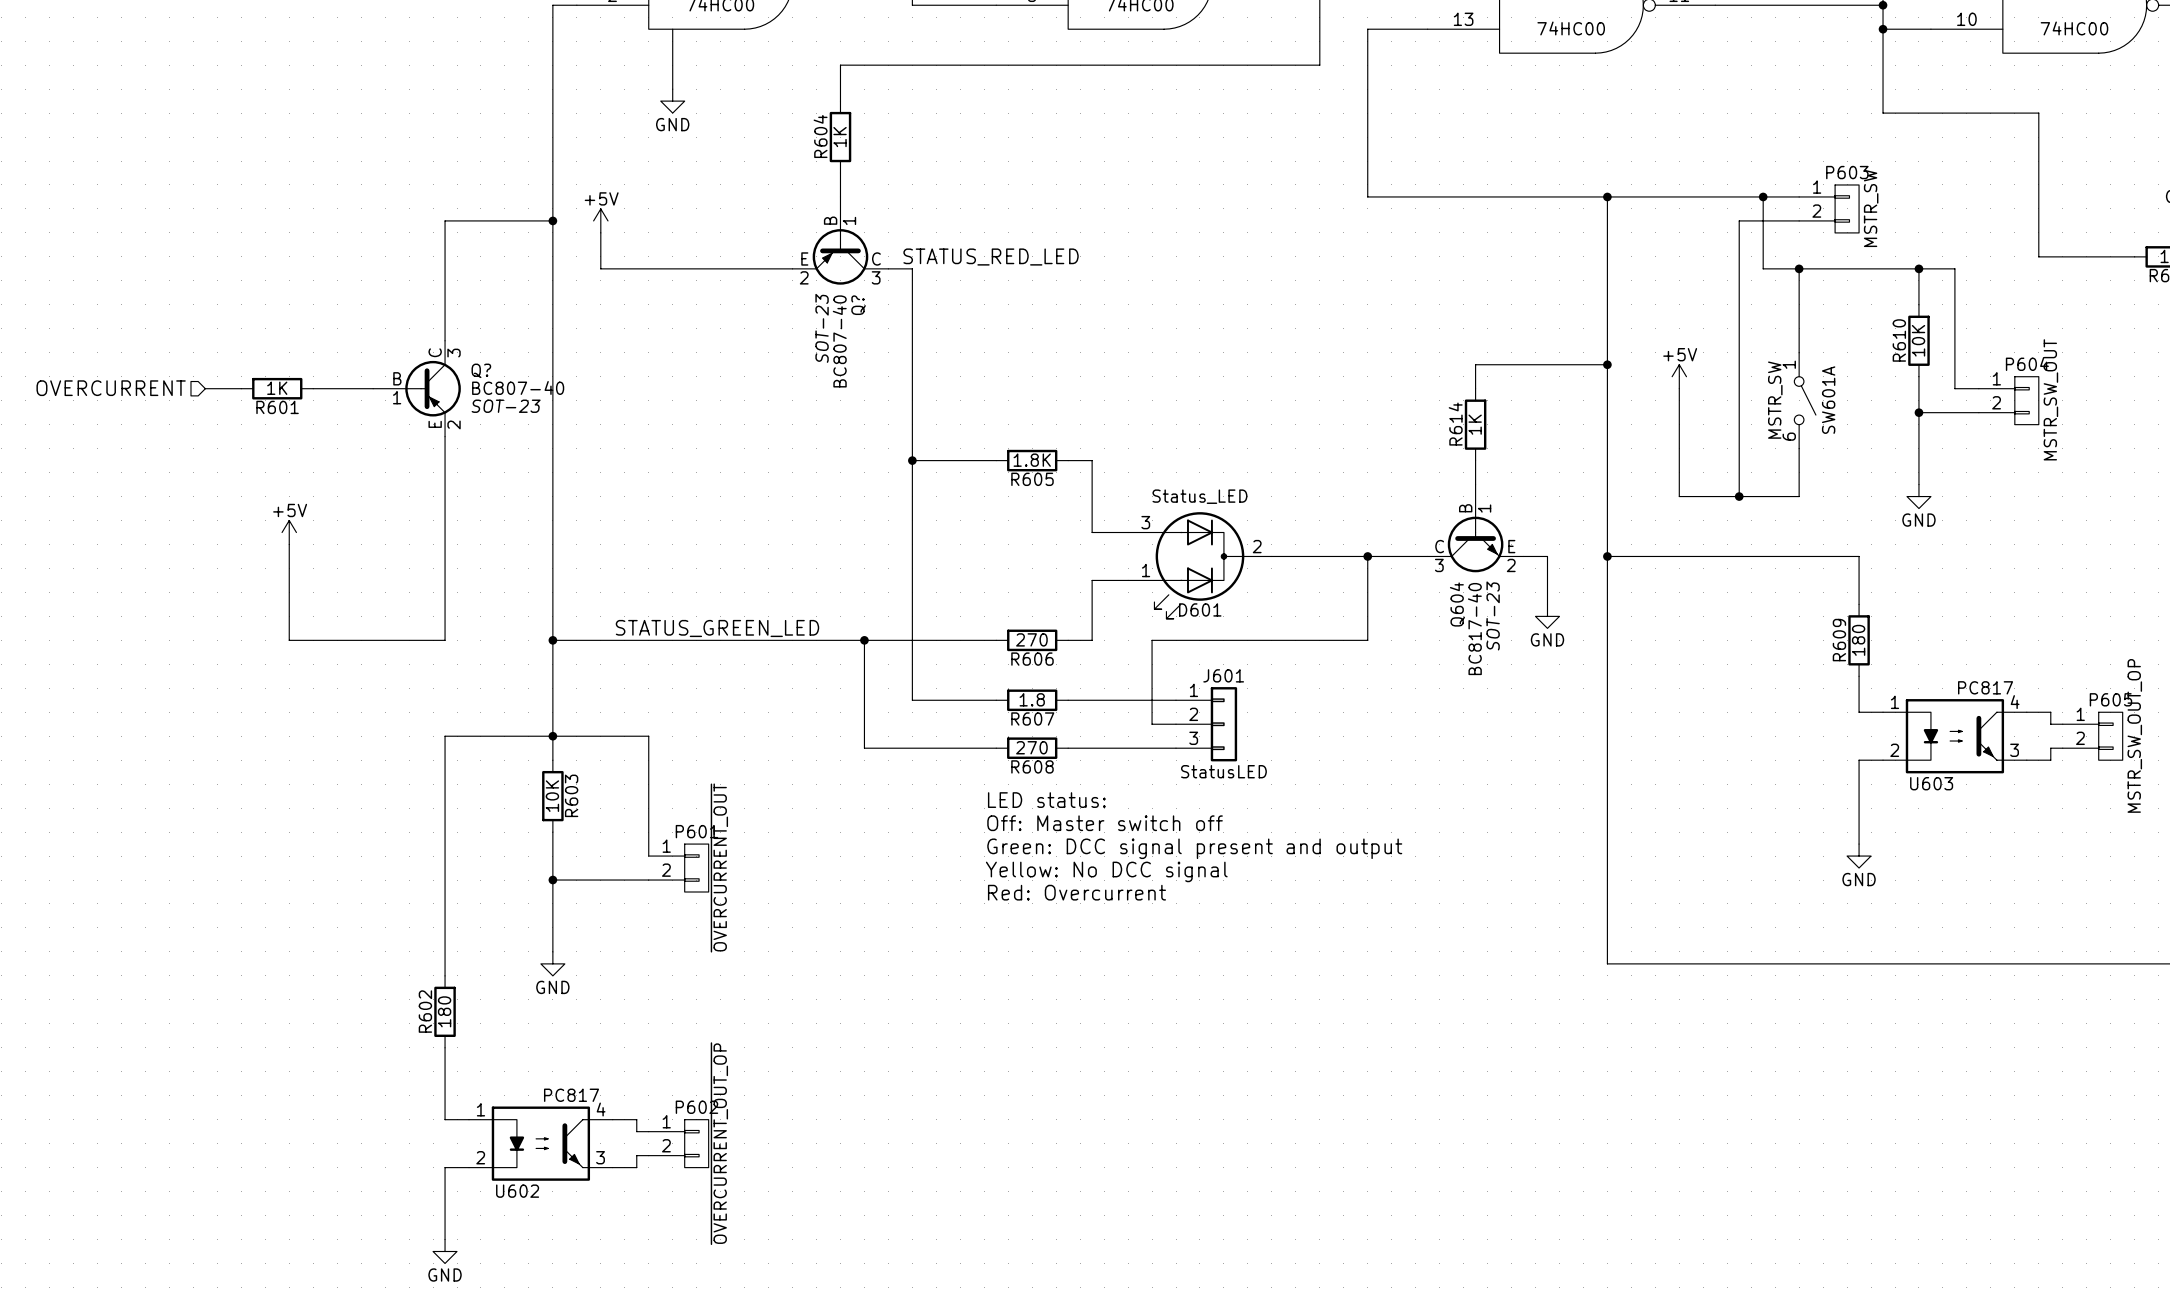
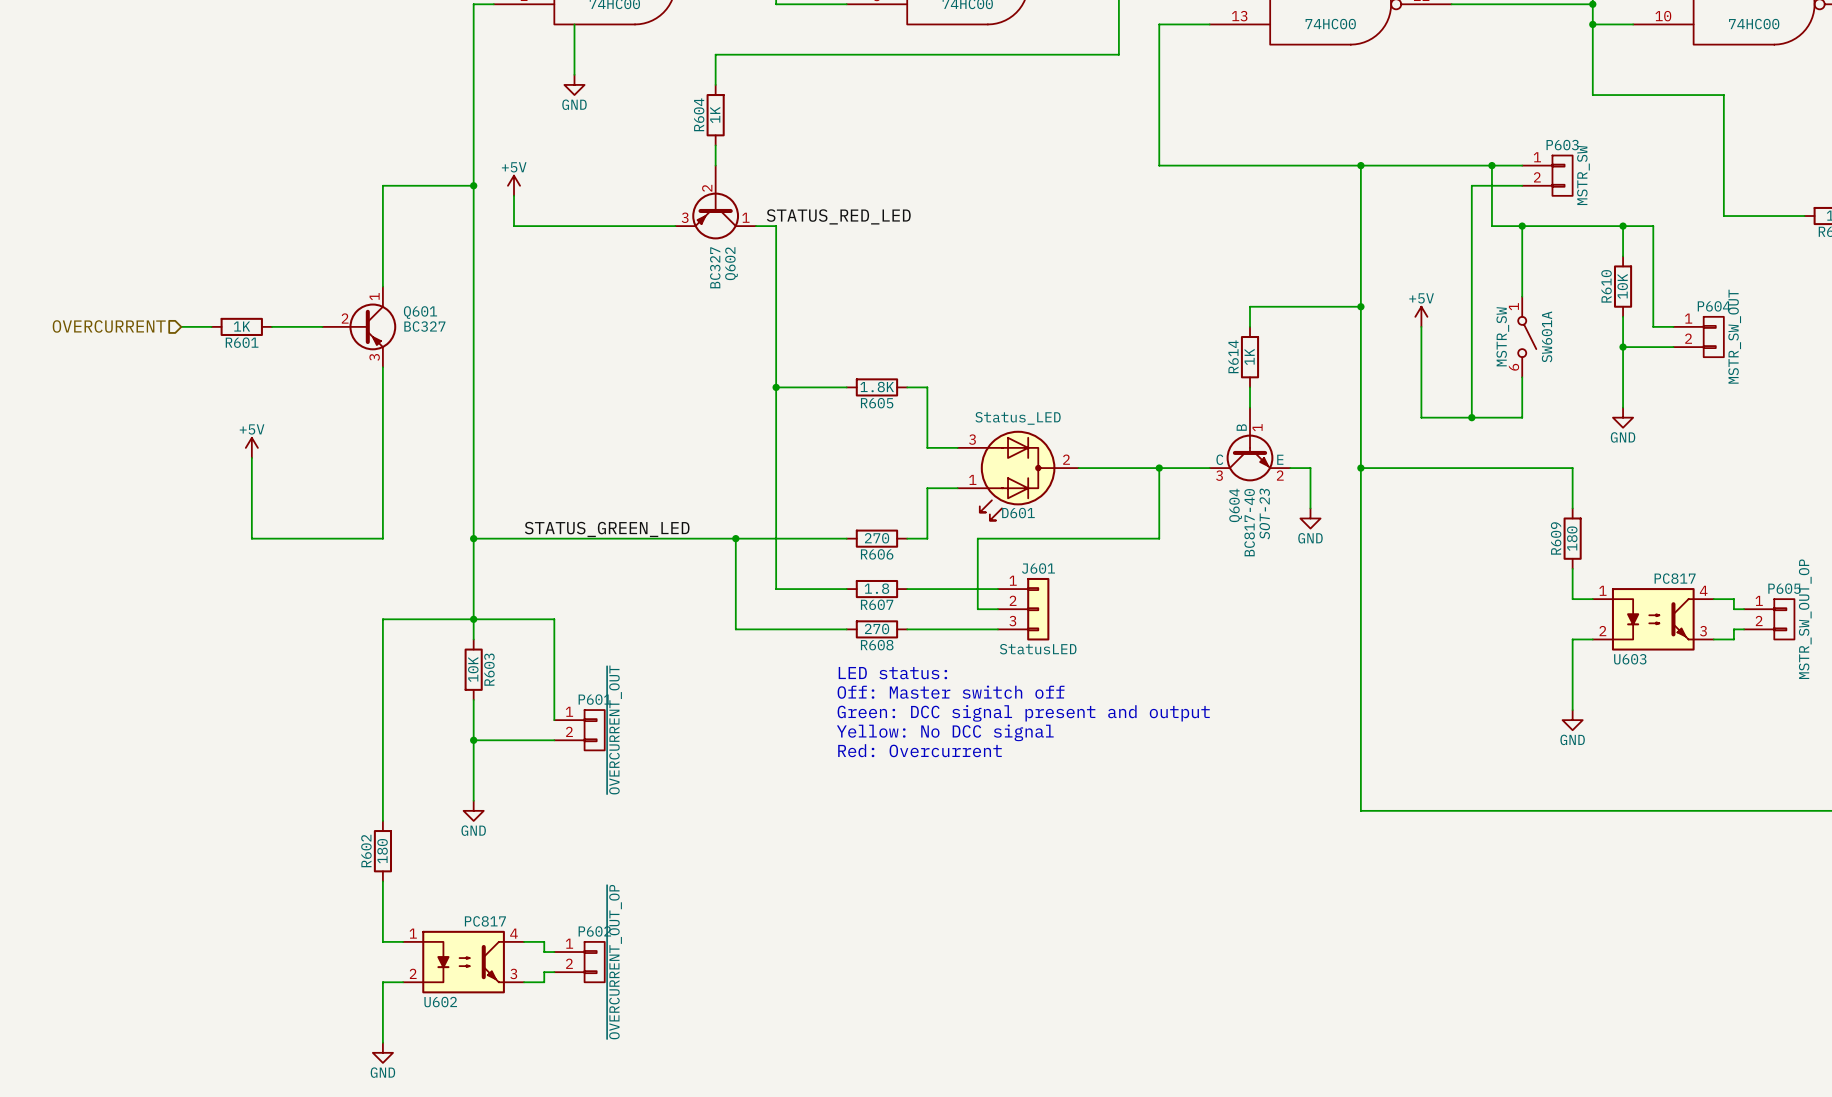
Q?: BC807-40 (840, 240) -> none
Q602: none -> BC327 (715, 202)
Q?: BC807-40 (416, 388) -> none
Q601: none -> BC327 (359, 326)

